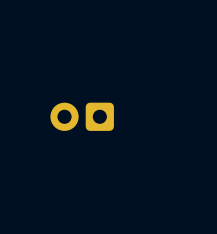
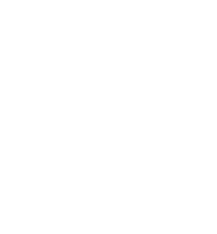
part: (82, 116) -> none

